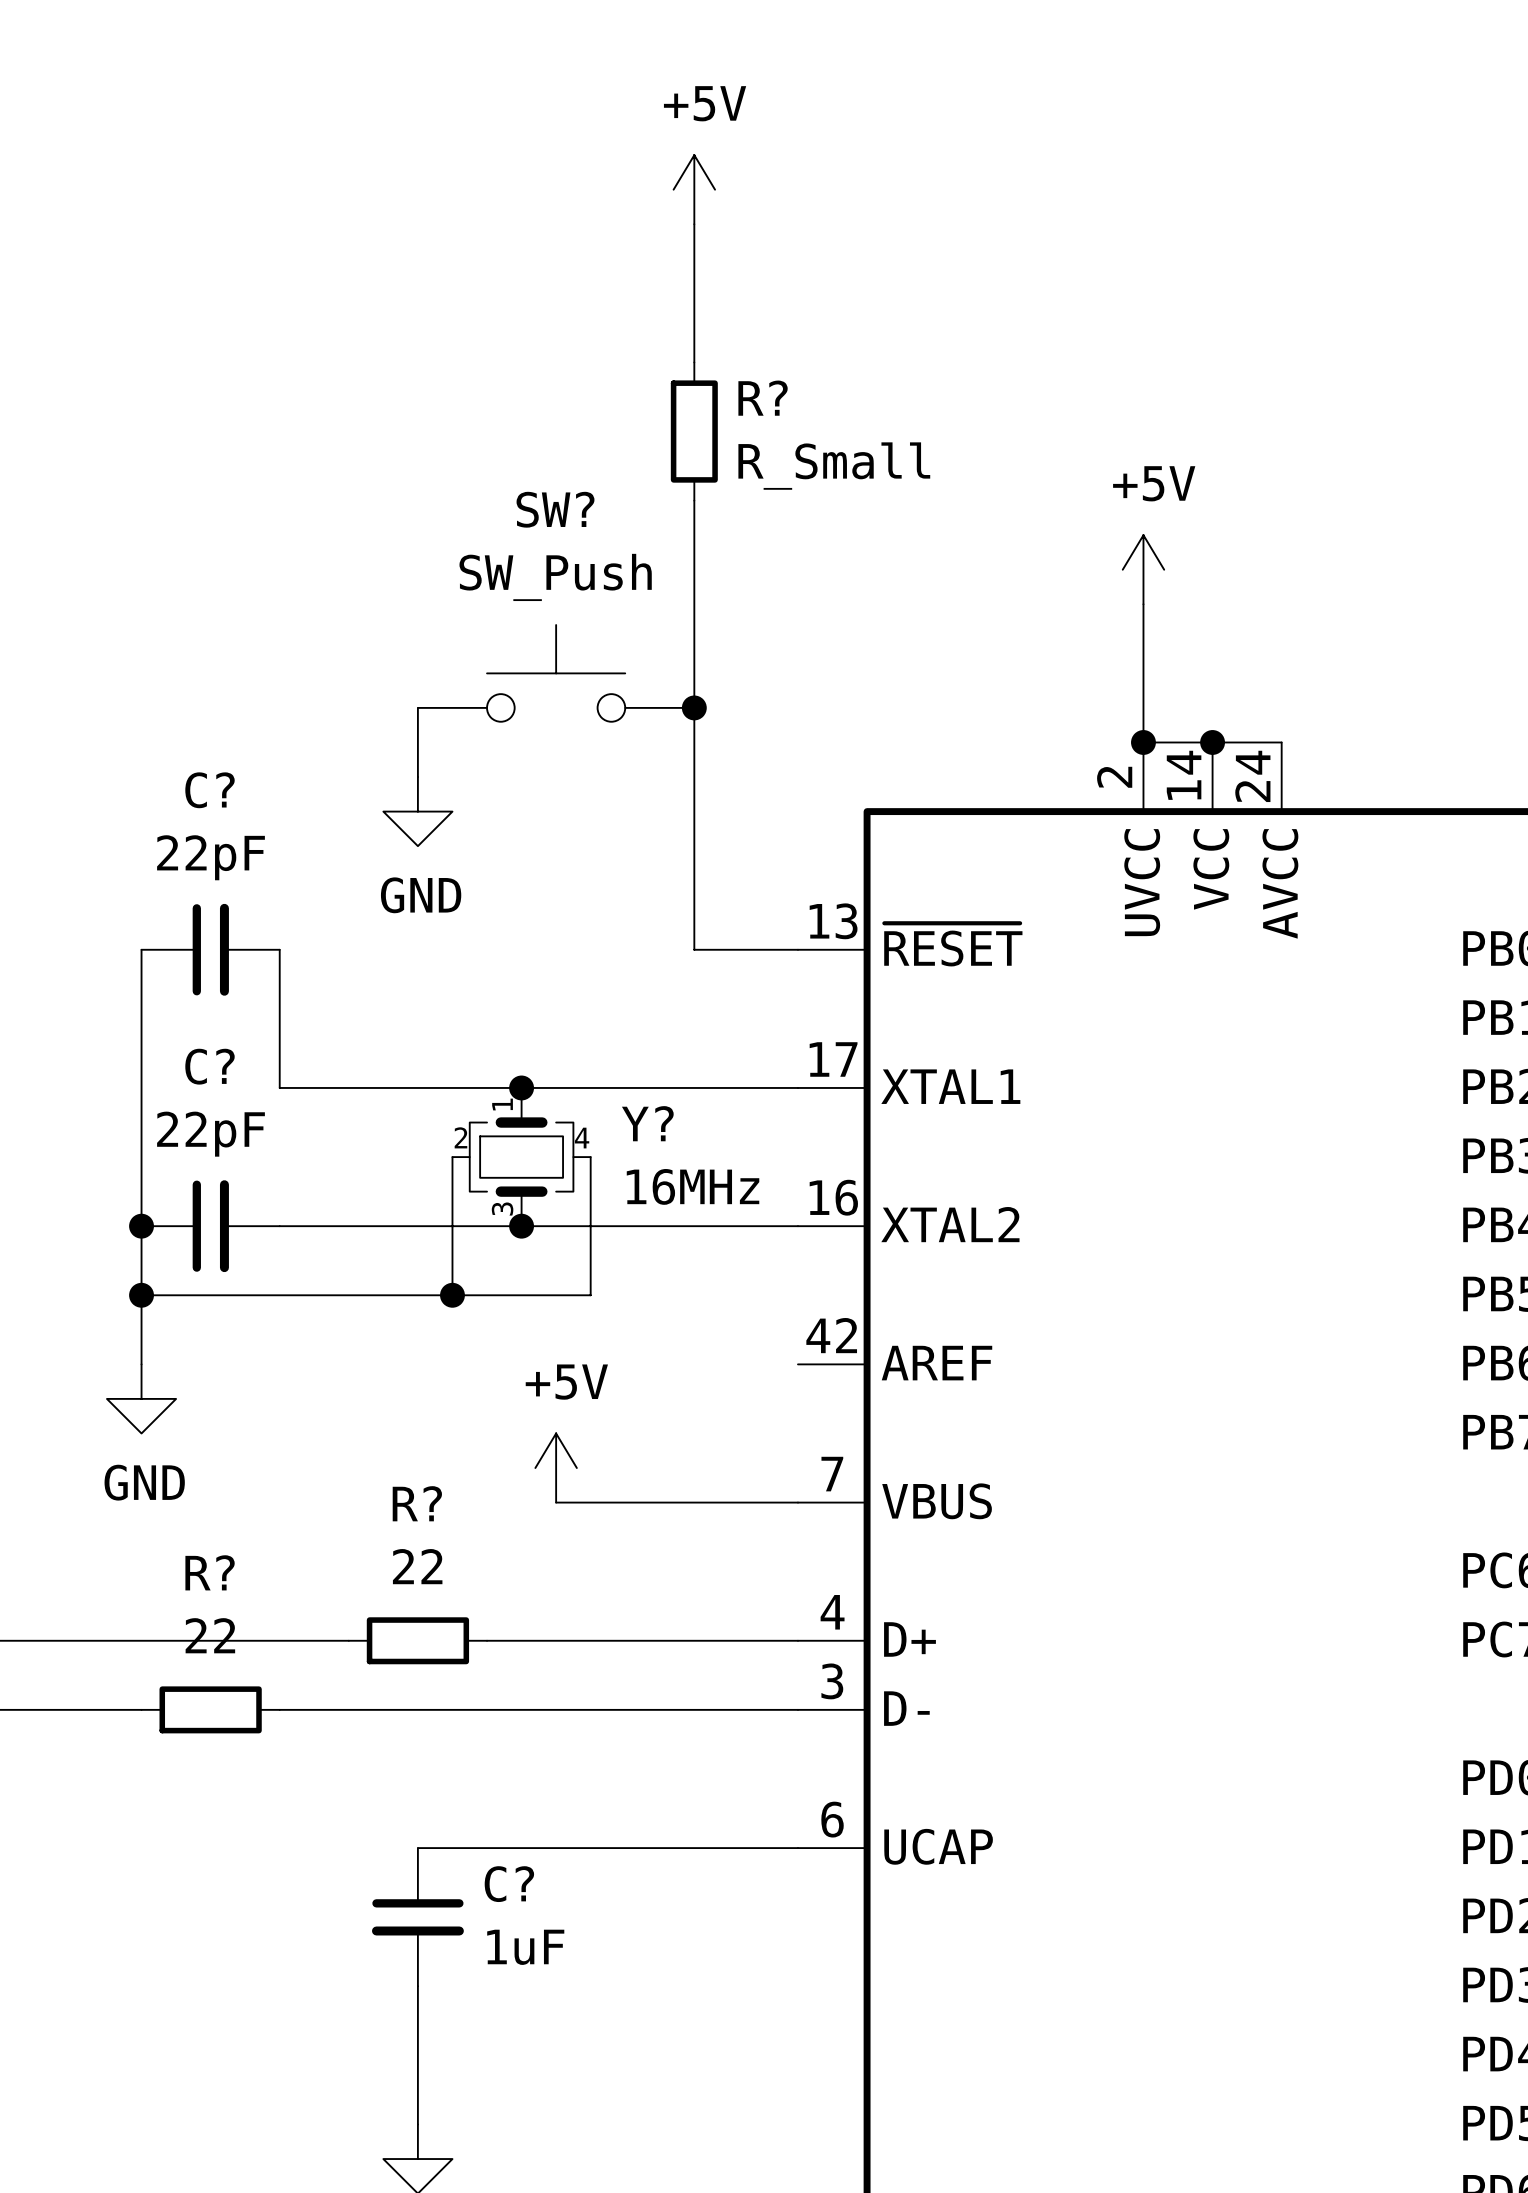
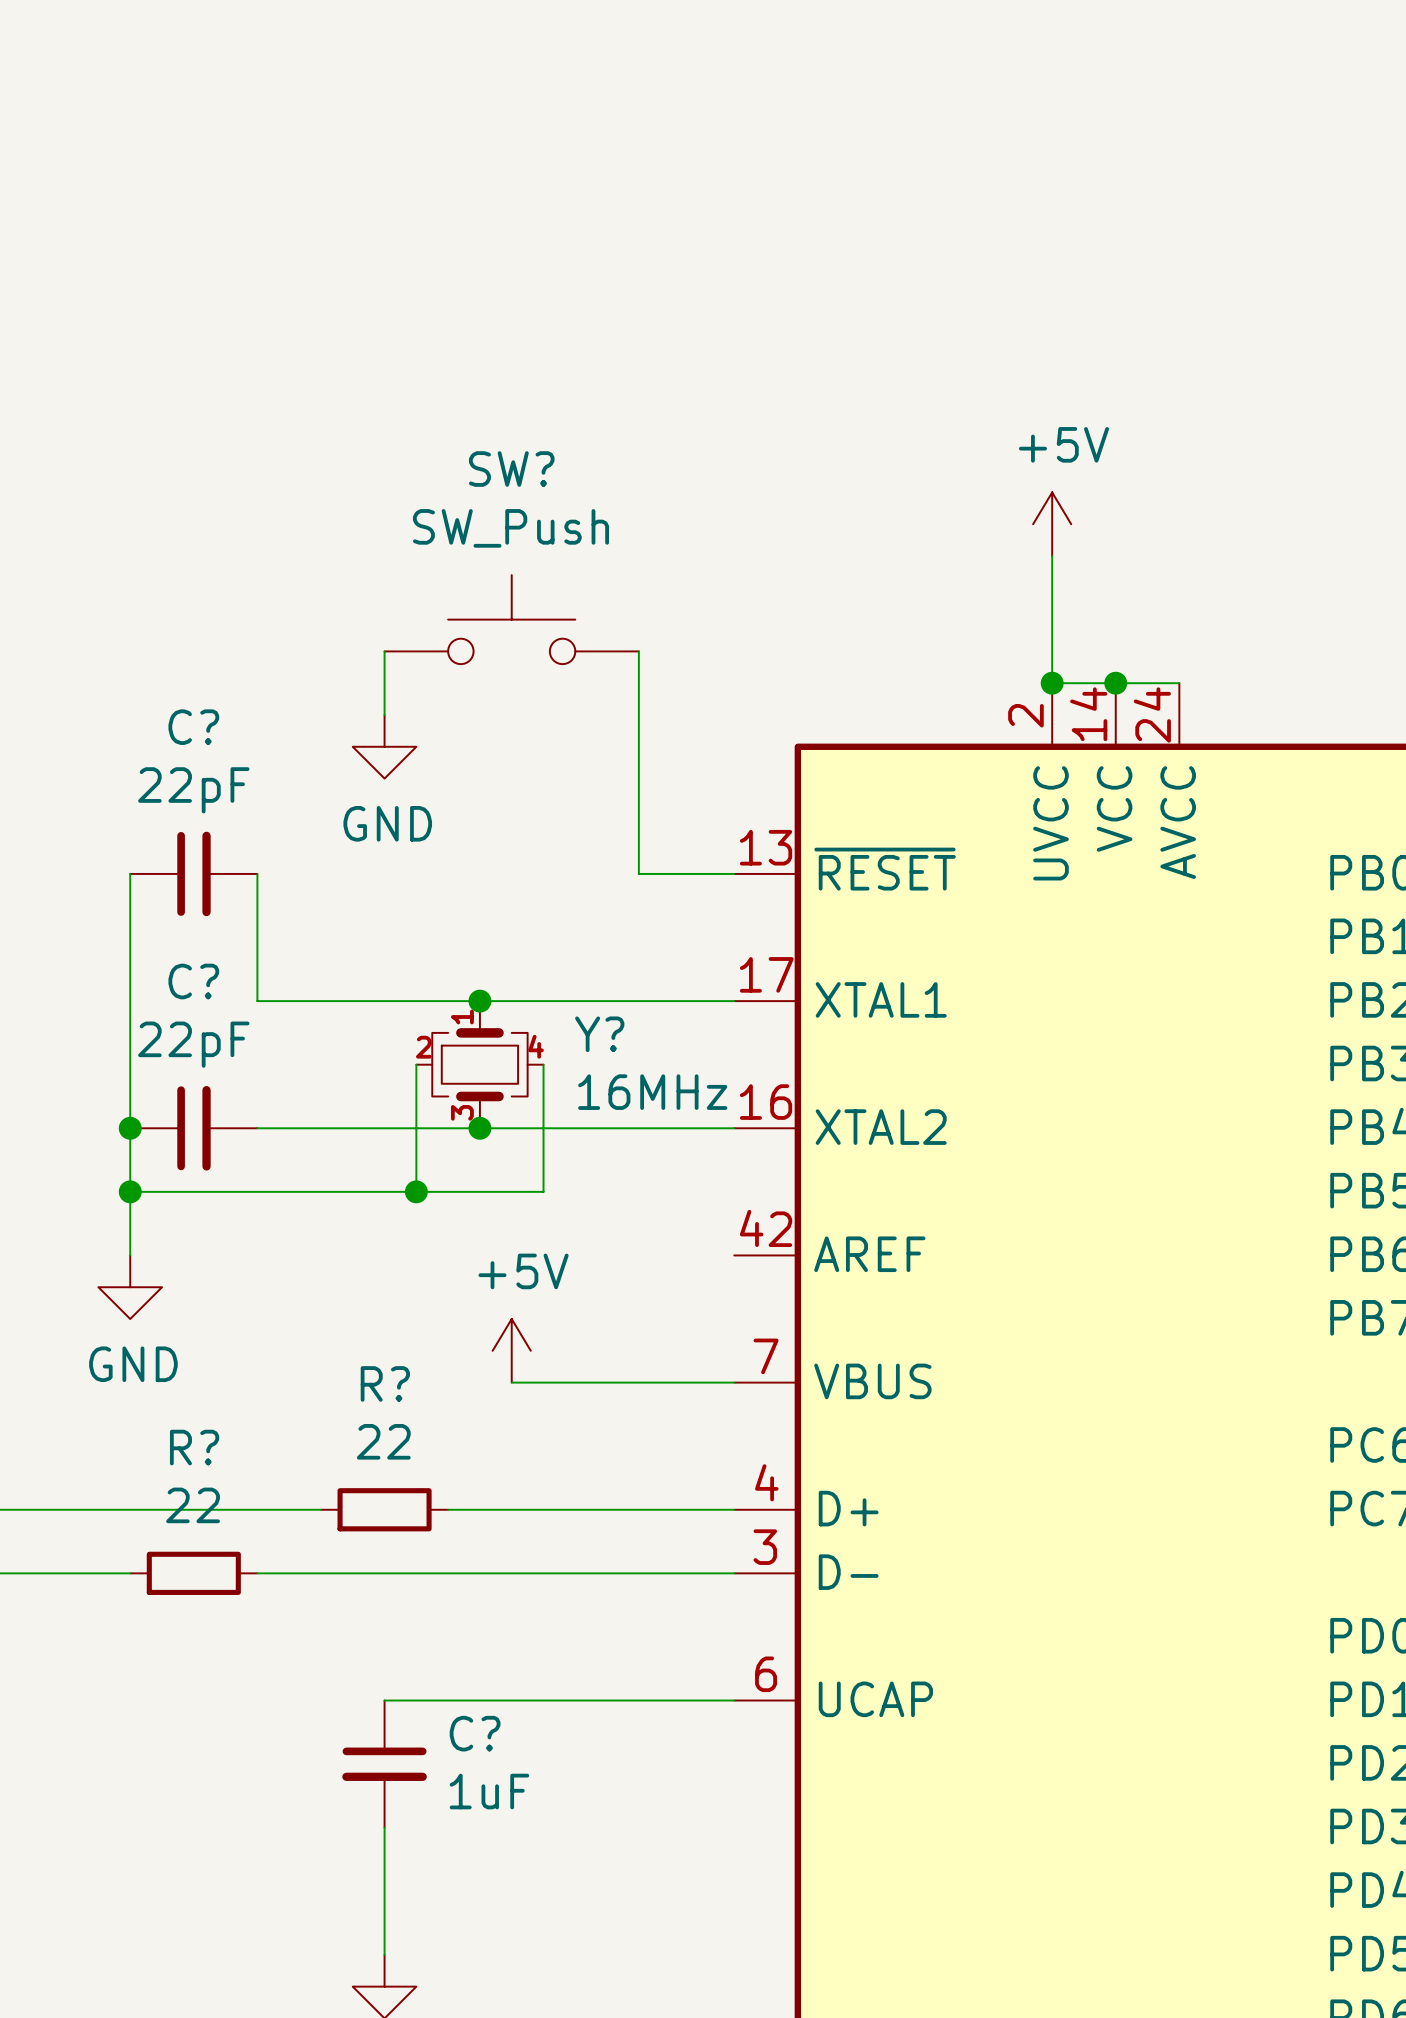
power symbol: +5V (694, 189) -> none
wire: (694, 224) (694, 362) -> none
R?: R_Small (694, 431) -> none
wire: (694, 500) (694, 707) -> none
junction: (694, 707) -> none

